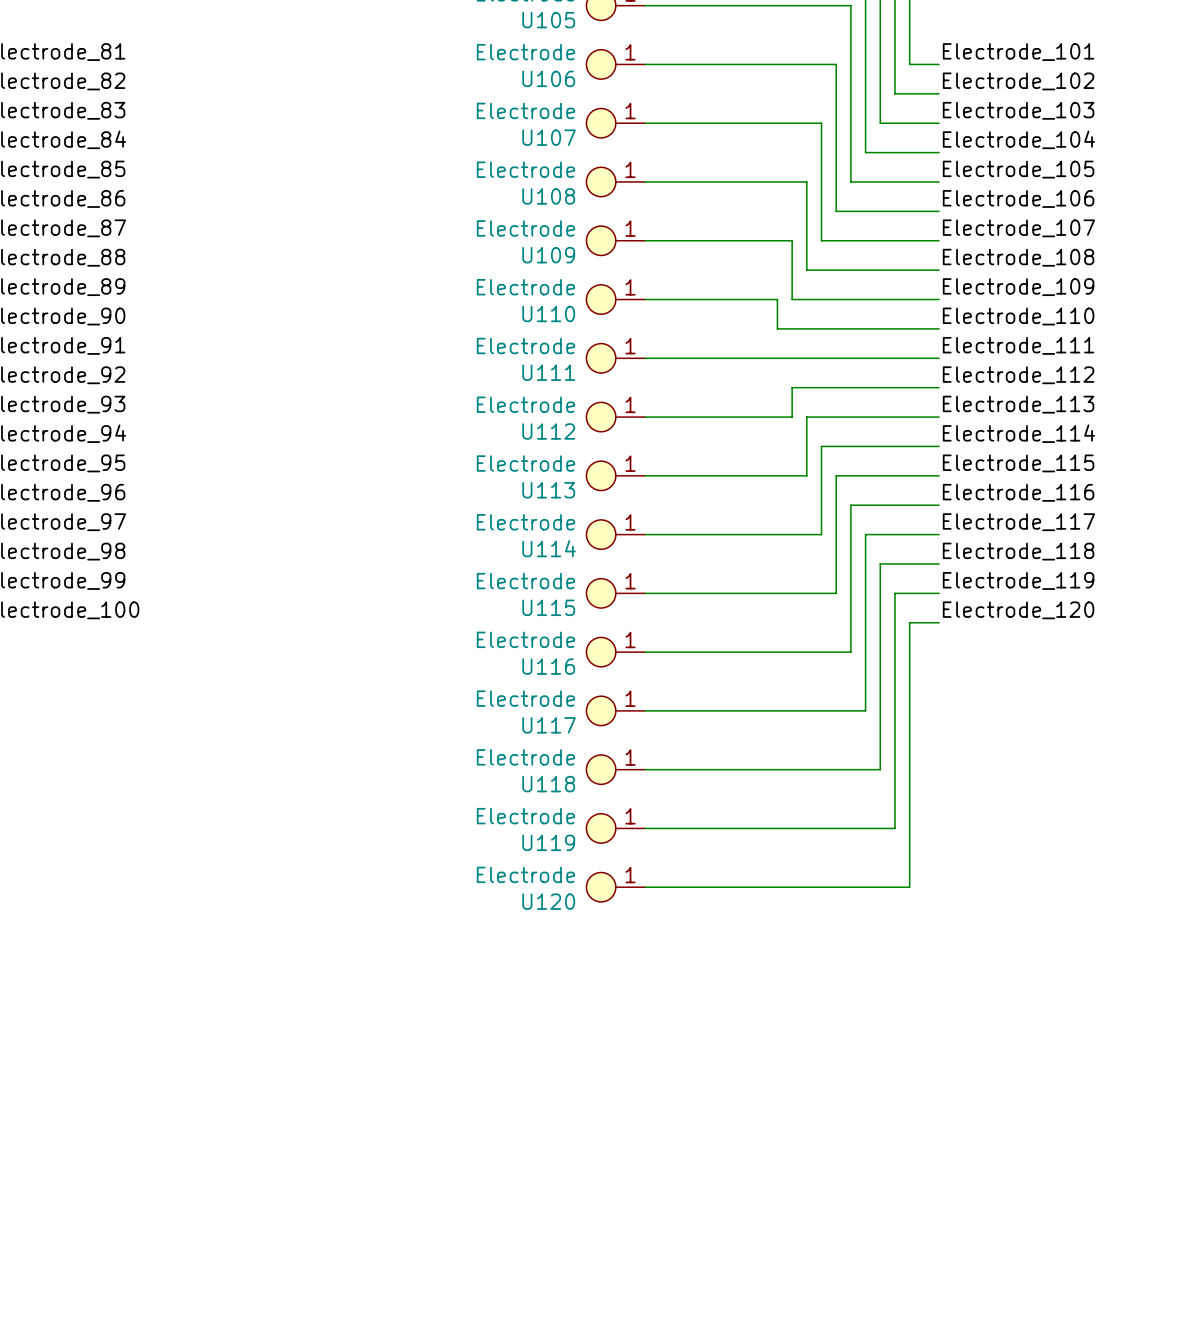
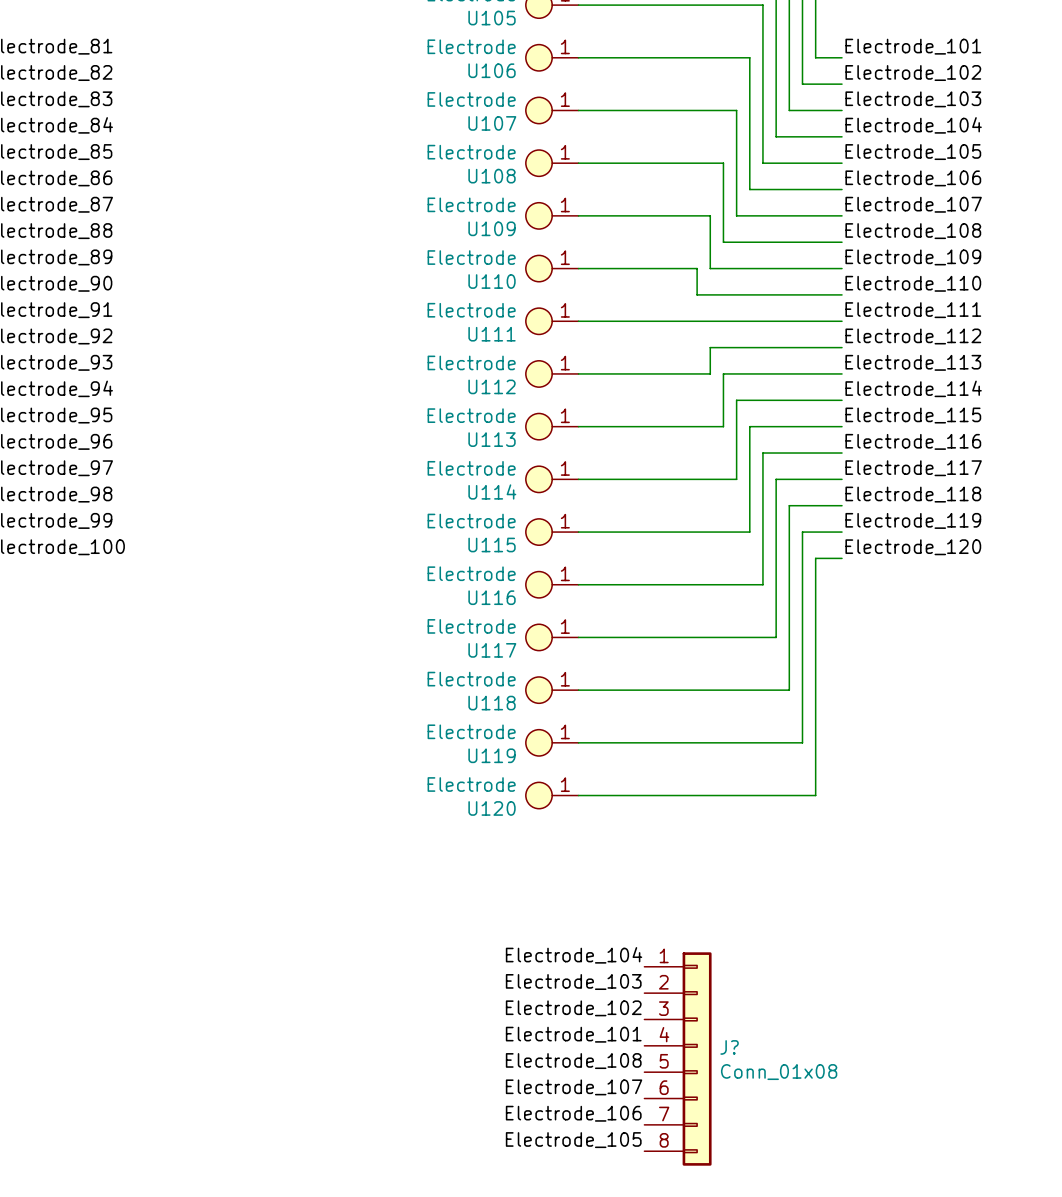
label: none -> Electrode_104 (574, 955)
label: none -> Electrode_103 (573, 982)
label: none -> Electrode_102 (573, 1008)
label: none -> Electrode_101 (573, 1034)
J?: none -> Conn_01x08 (677, 1059)
label: none -> Electrode_108 (573, 1061)
label: none -> Electrode_107 (574, 1087)
label: none -> Electrode_106 (573, 1113)
label: none -> Electrode_105 (573, 1140)

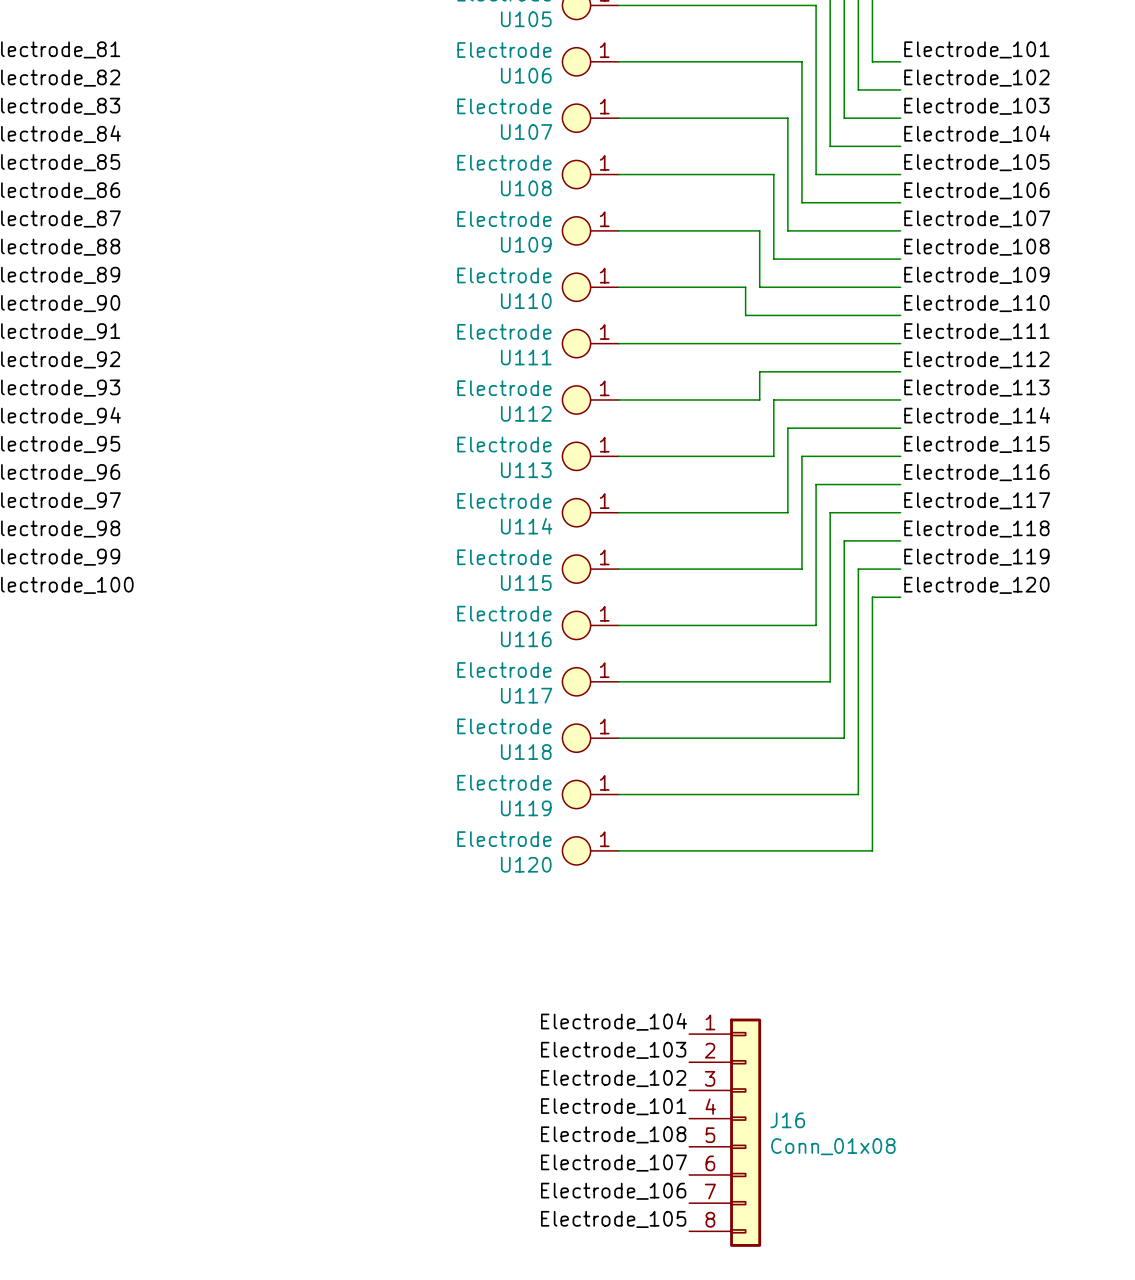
J? name: J? (729, 1047) -> J16 (787, 1120)

